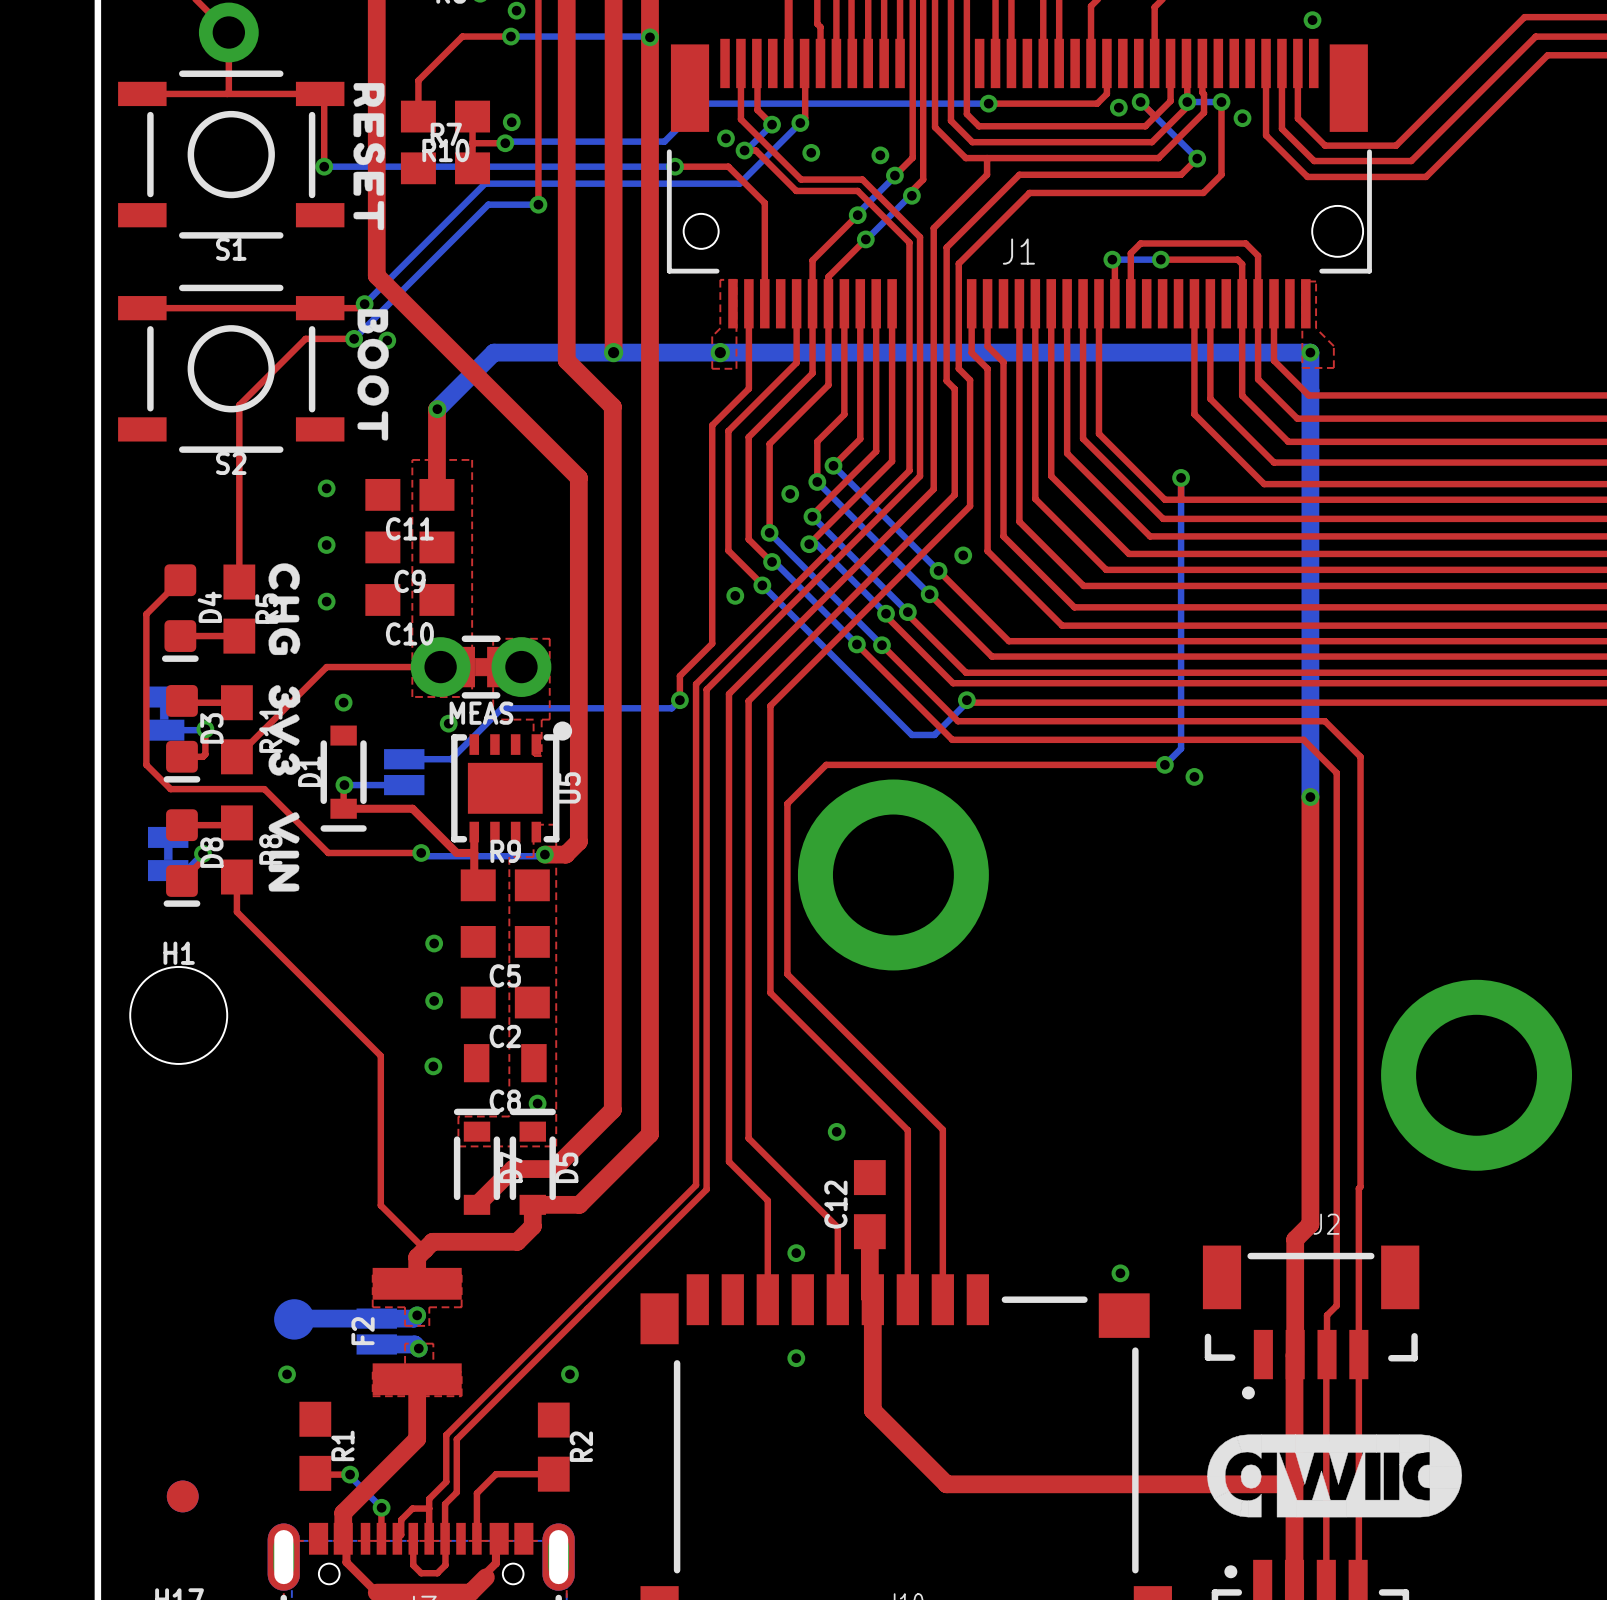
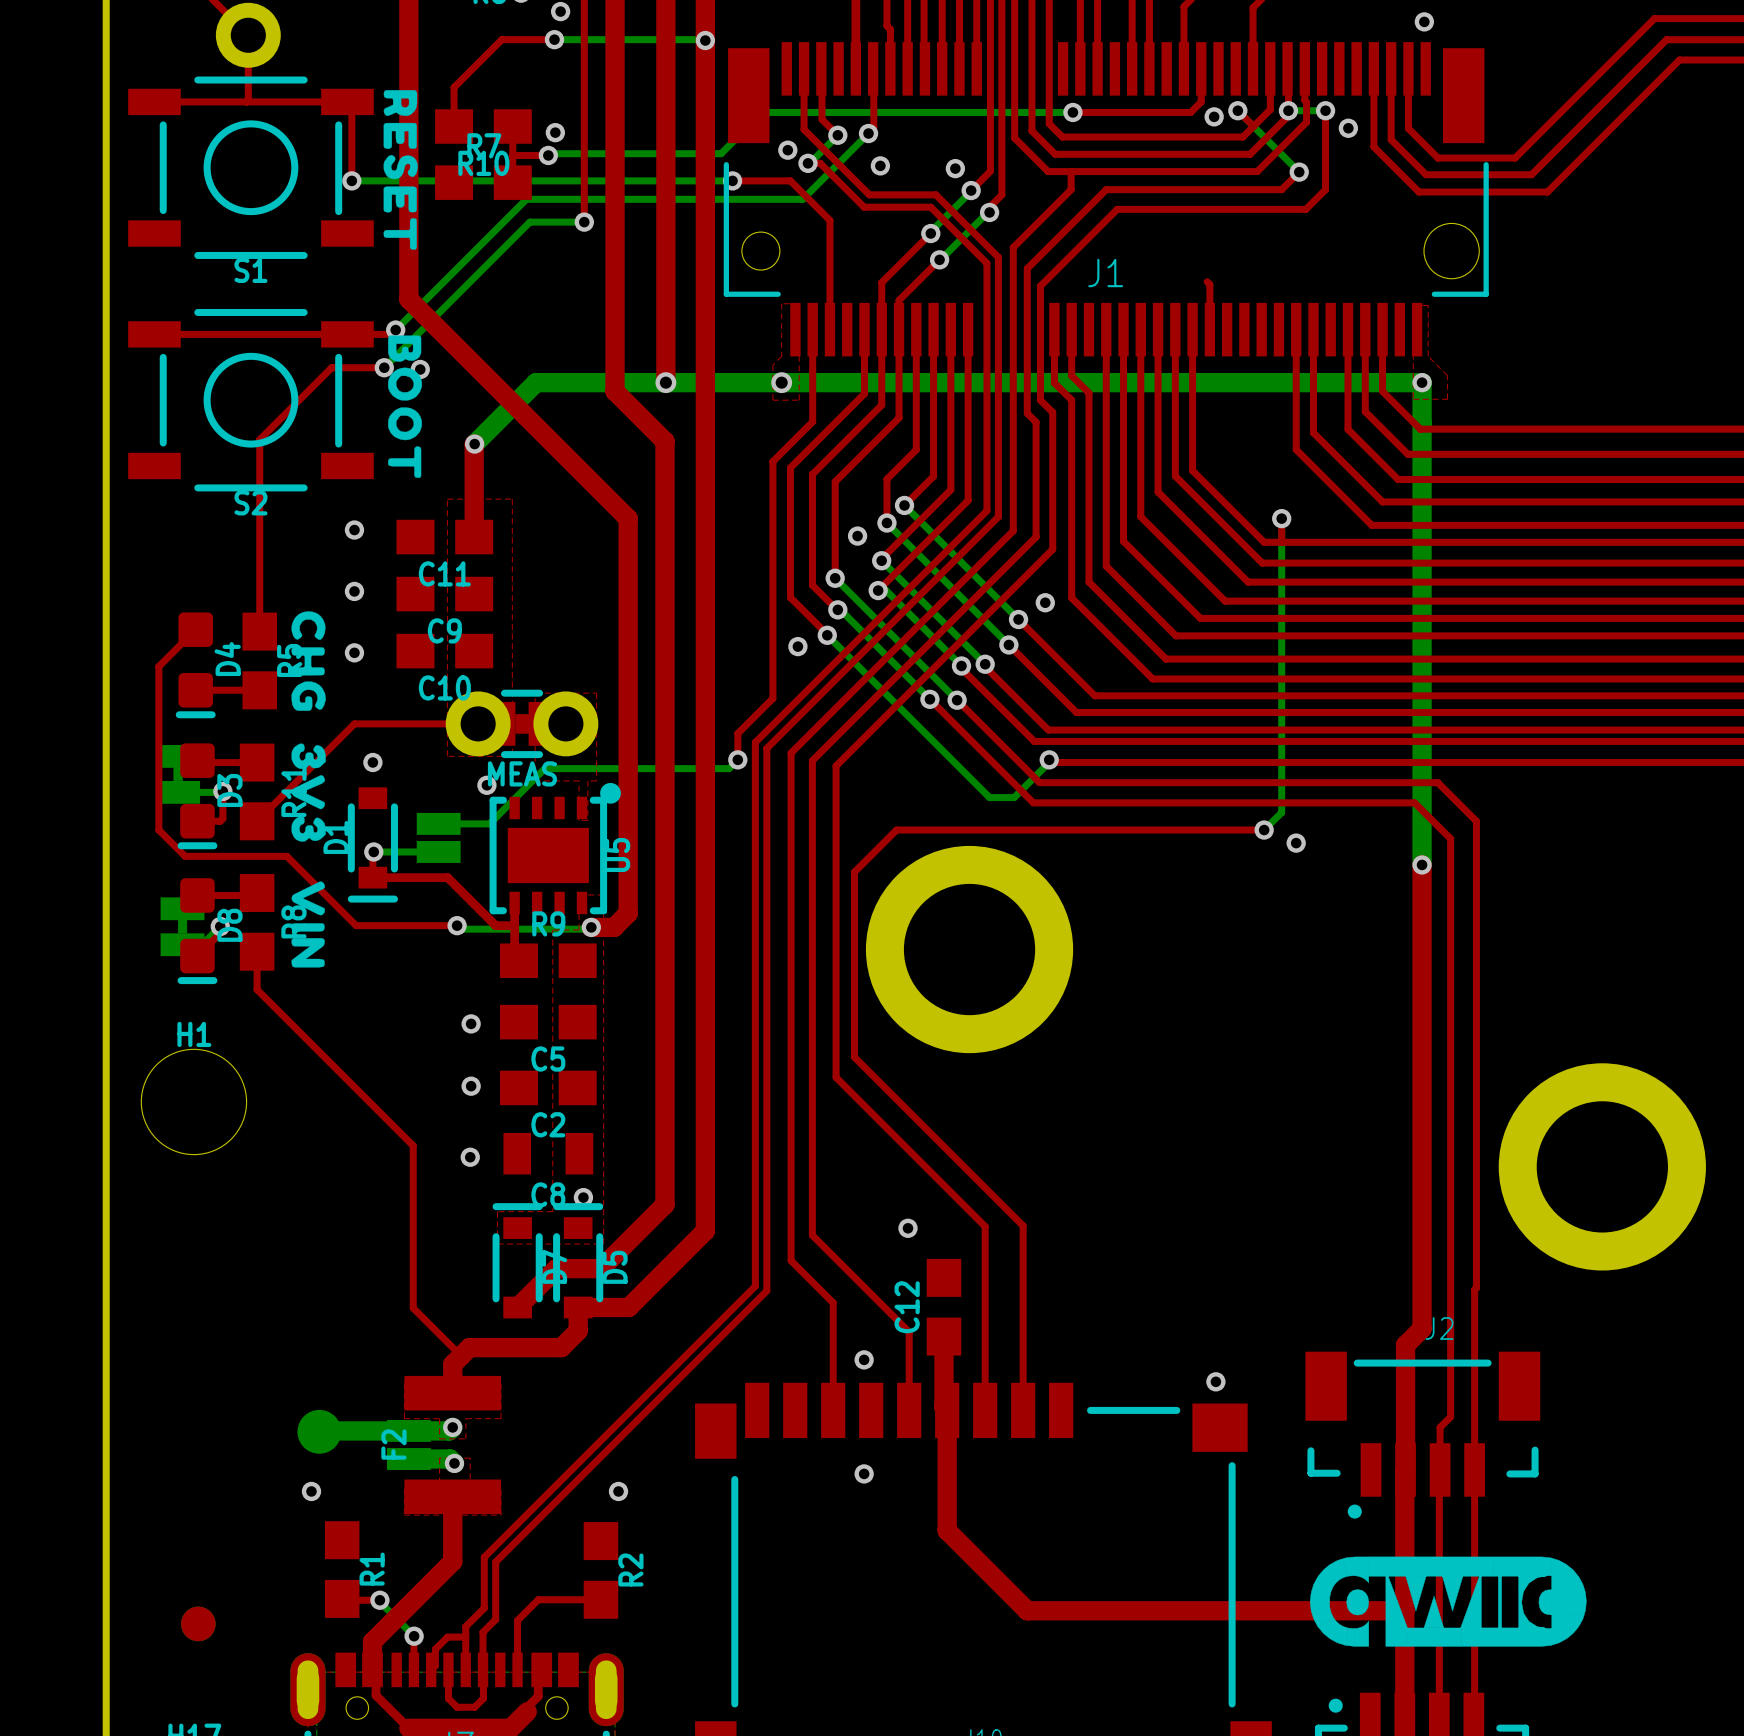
bottom track: (1112, 259) (1160, 259) -> none
via: (1112, 259) -> none
top track: (1160, 259) (1237, 259) (1242, 264) (1242, 303) -> none
via: (1160, 259) -> none
top track: (1130, 303) (1130, 253) (1140, 243) (1245, 243) (1258, 255) (1258, 303) -> none

